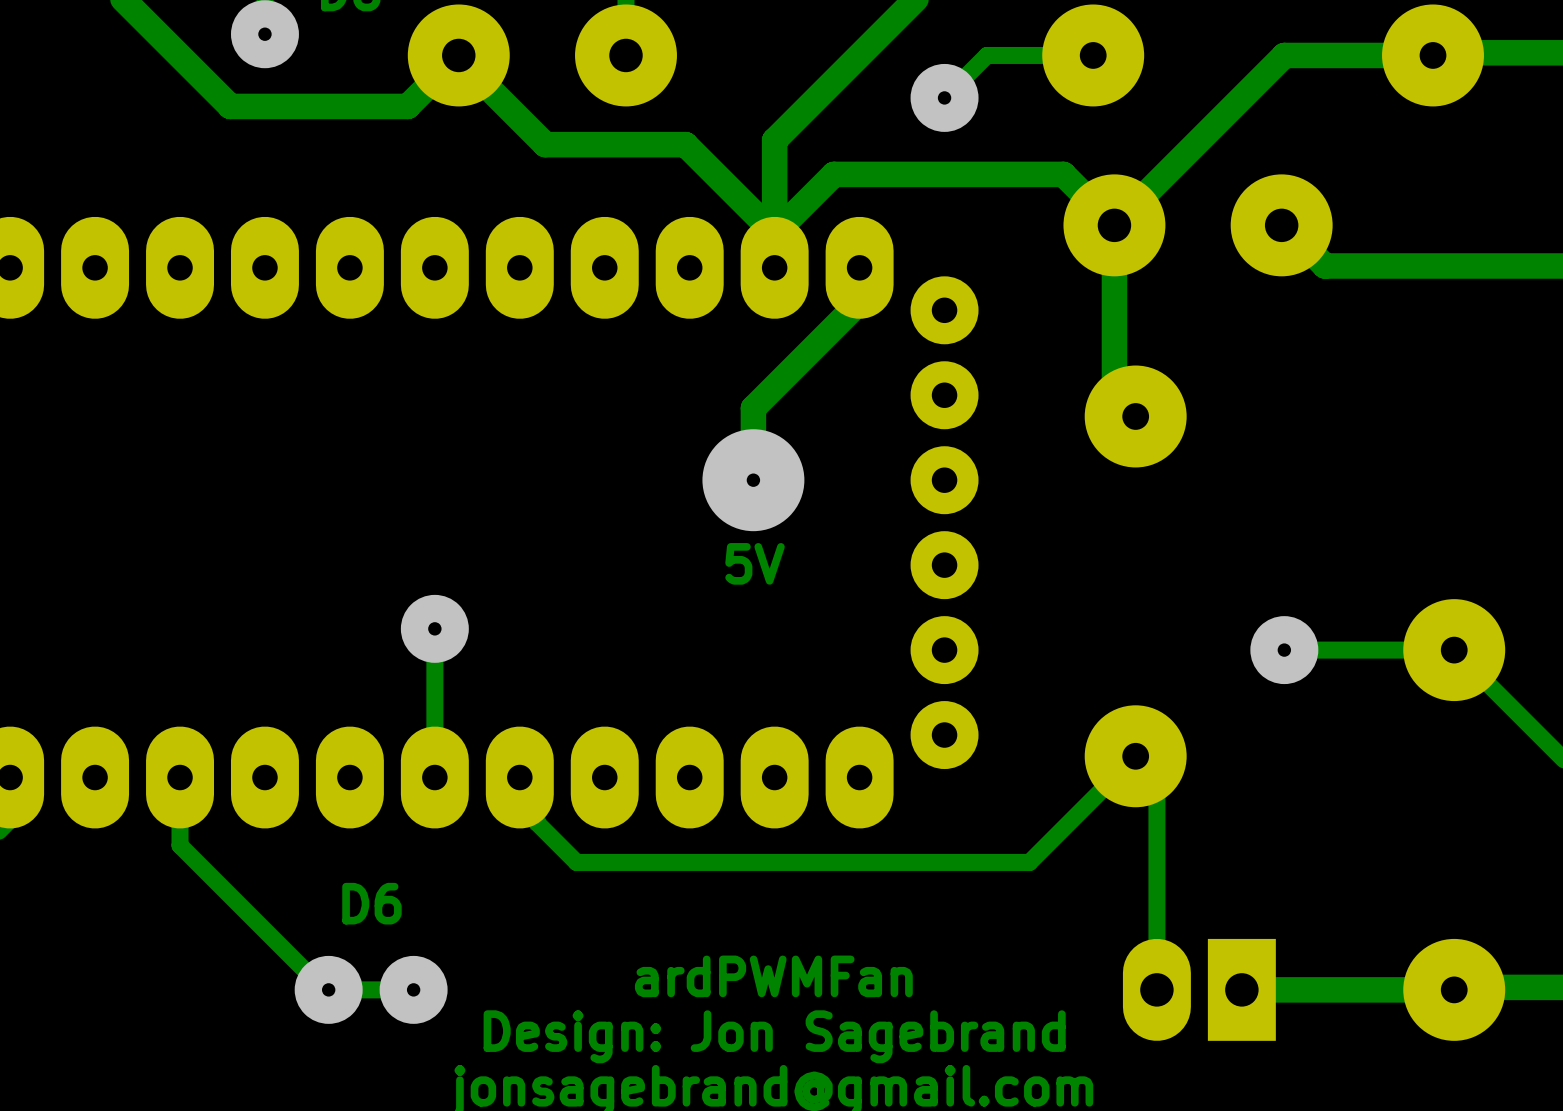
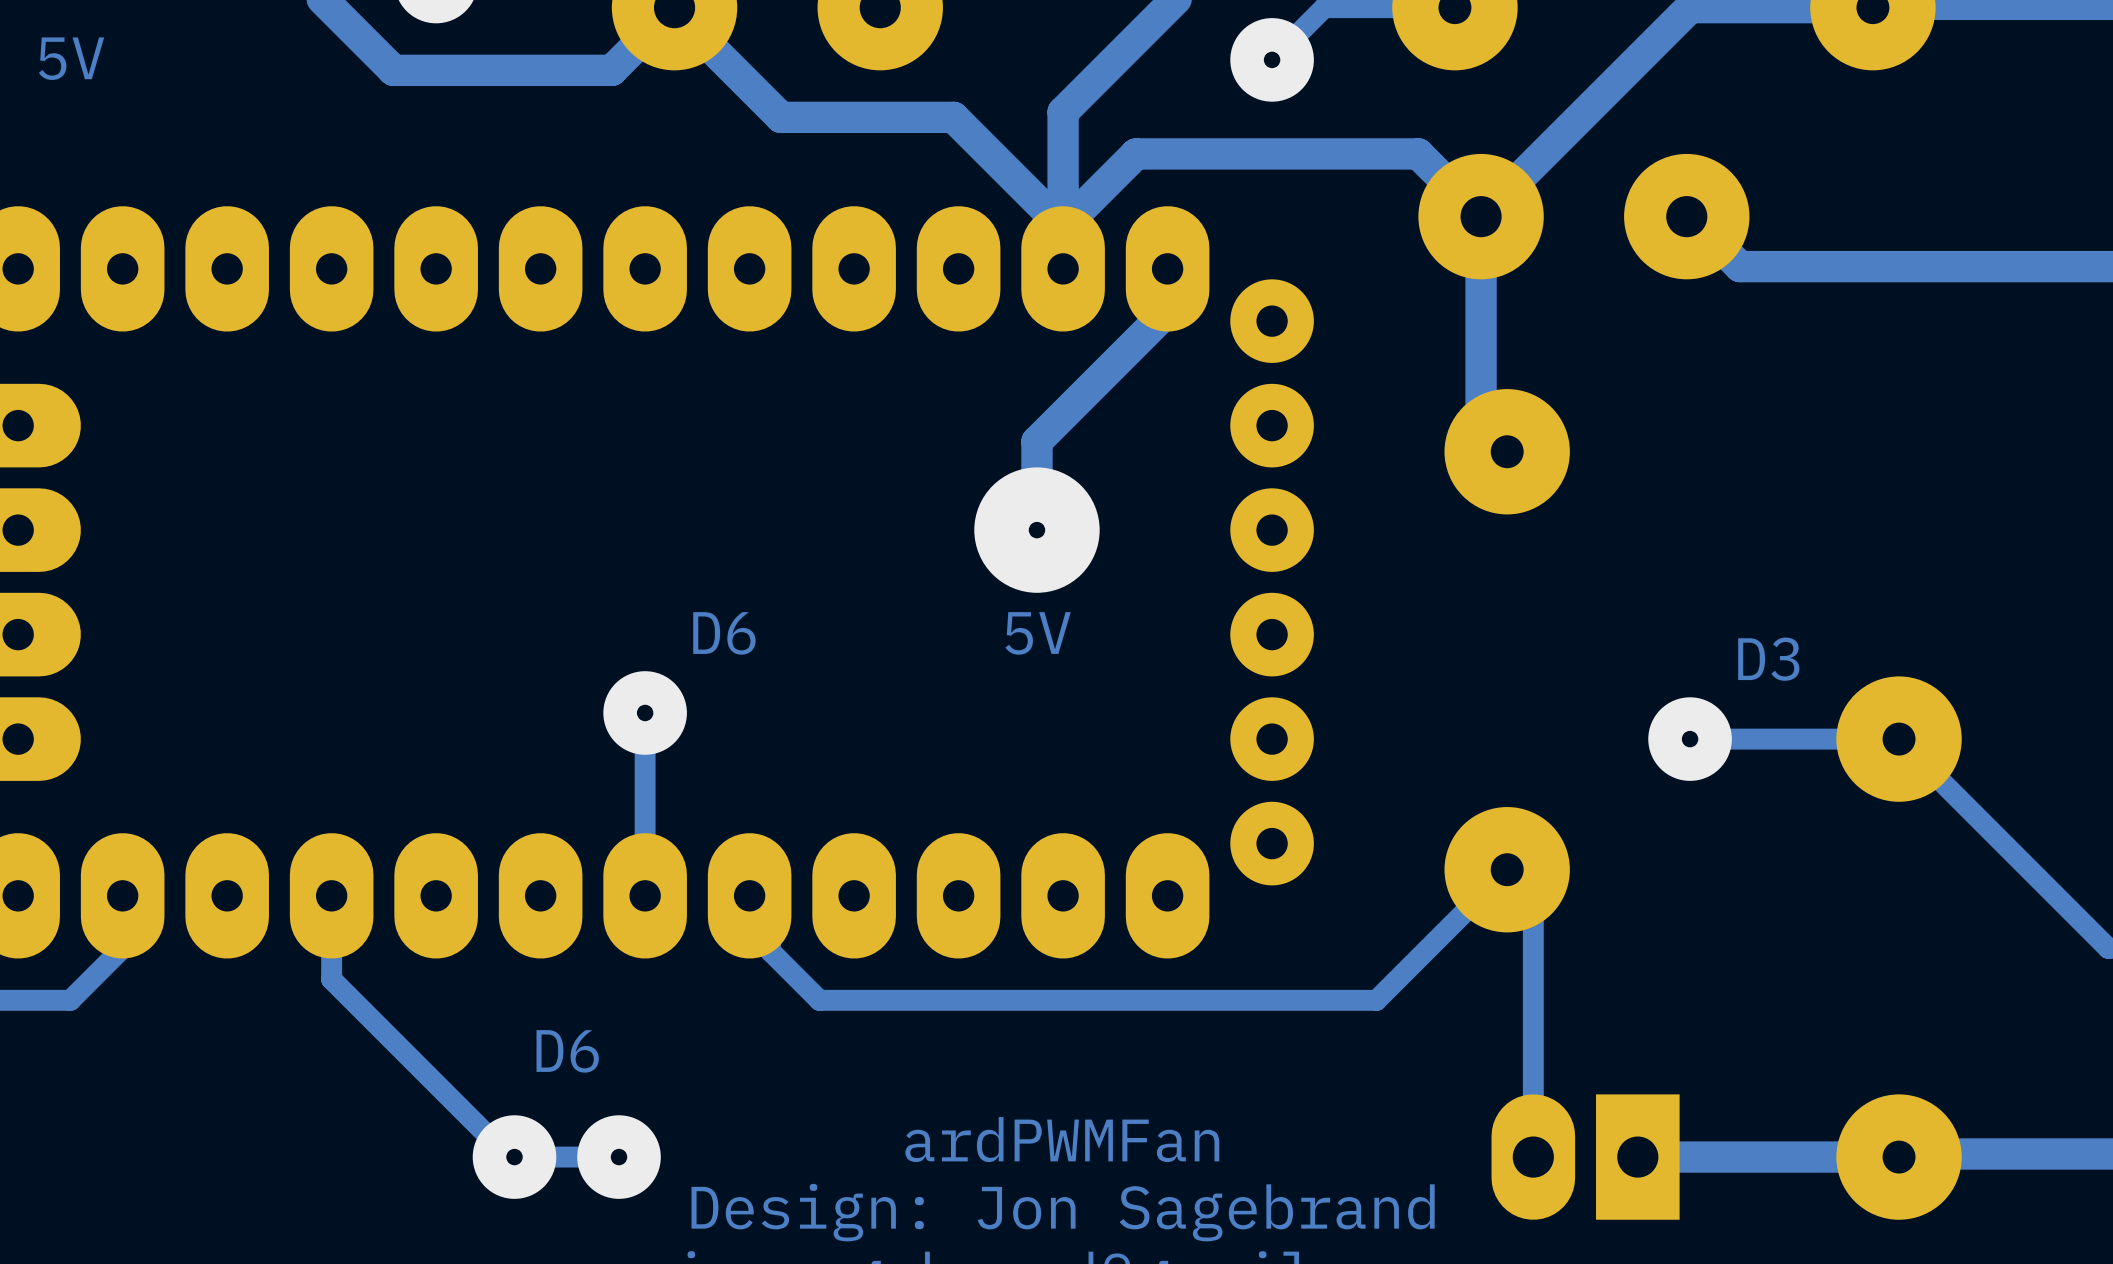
text: none -> D6 (724, 633)
text: none -> D3 (1768, 659)

